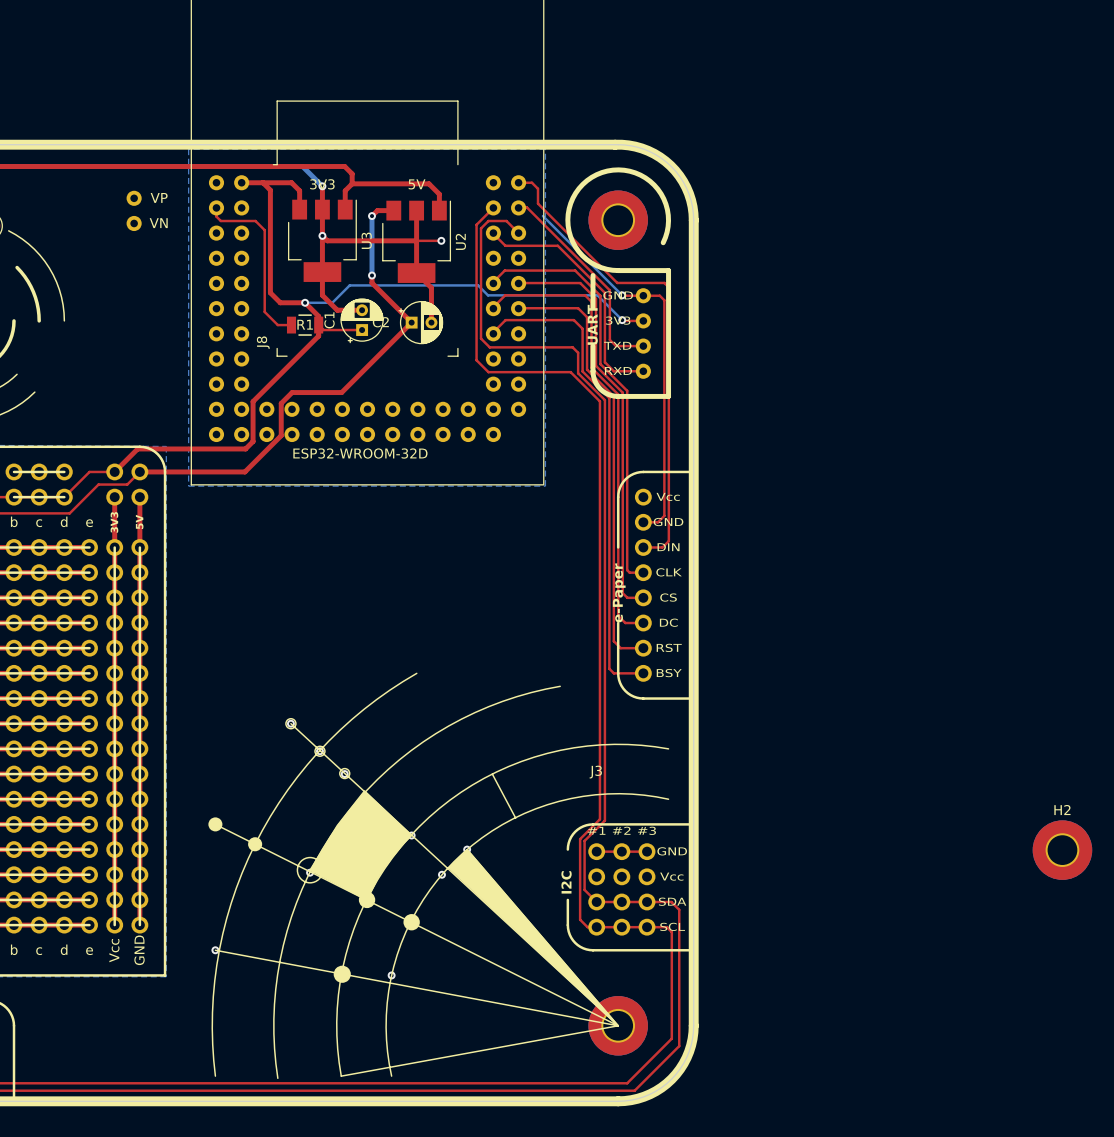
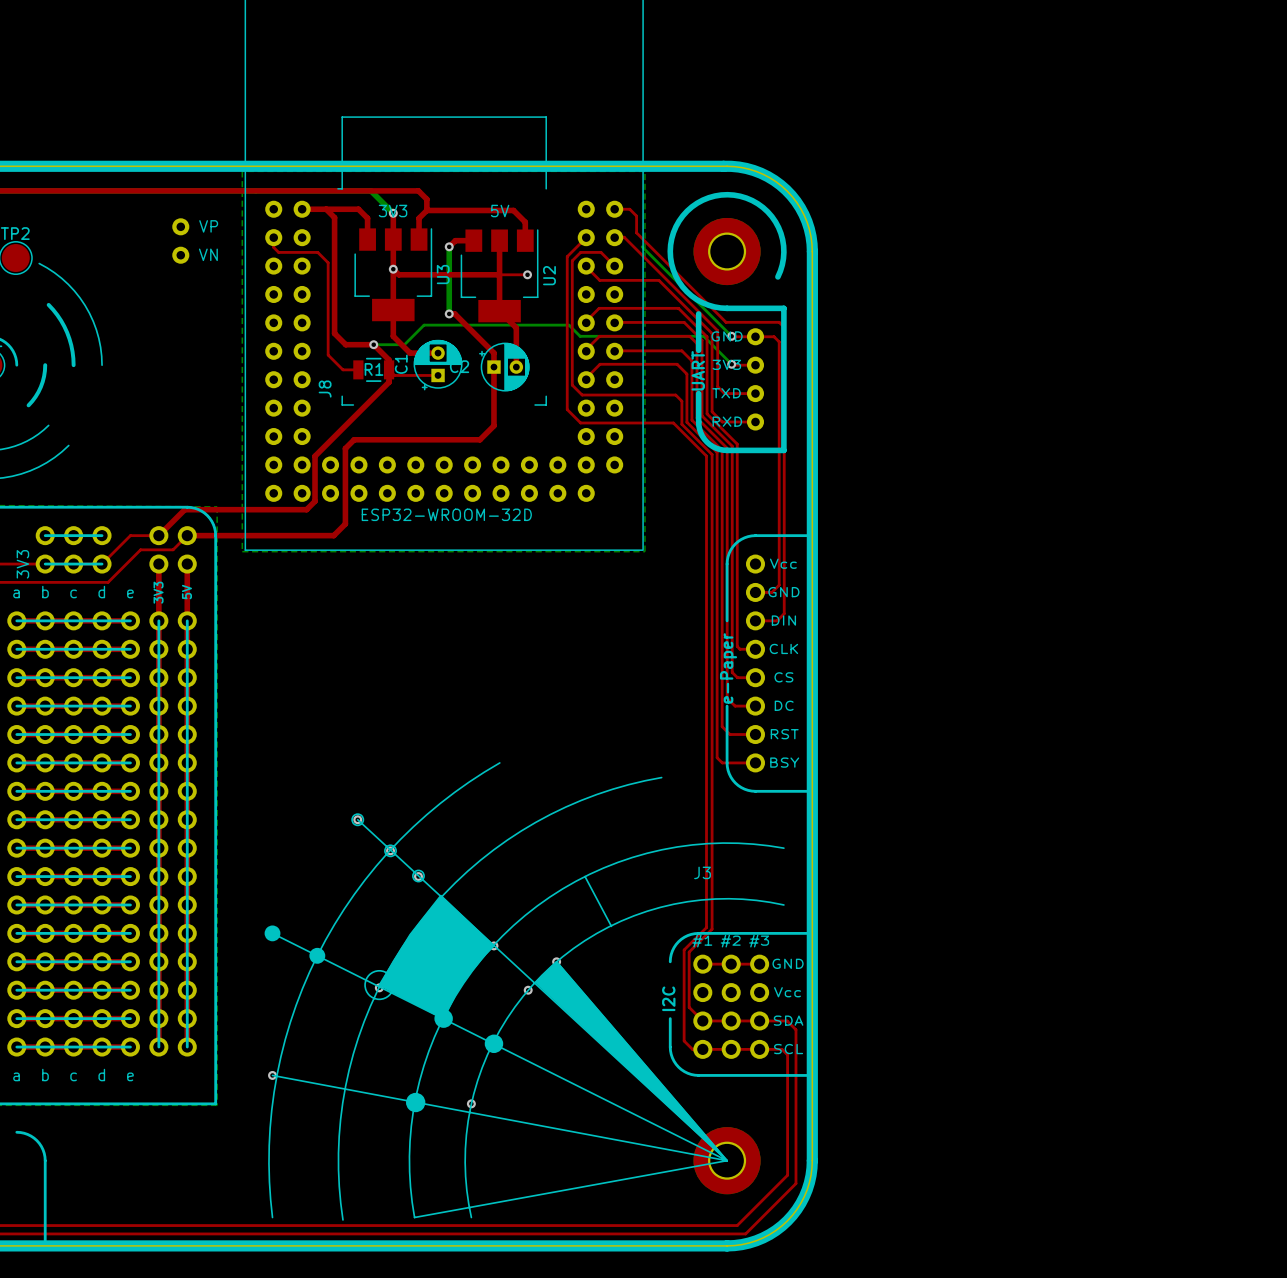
top track: (372, 275) (372, 282) (411, 322) (341, 392) (292, 392) (281, 403) (281, 435) (244, 471) -> (449, 313) (454, 313) (493, 353) (493, 425) (479, 439) (354, 439) (345, 448) (345, 524) (333, 535) (305, 535)
H2: (1062, 850) -> none
part text: Vcc (114, 950) -> none
part text: GND (139, 950) -> none

